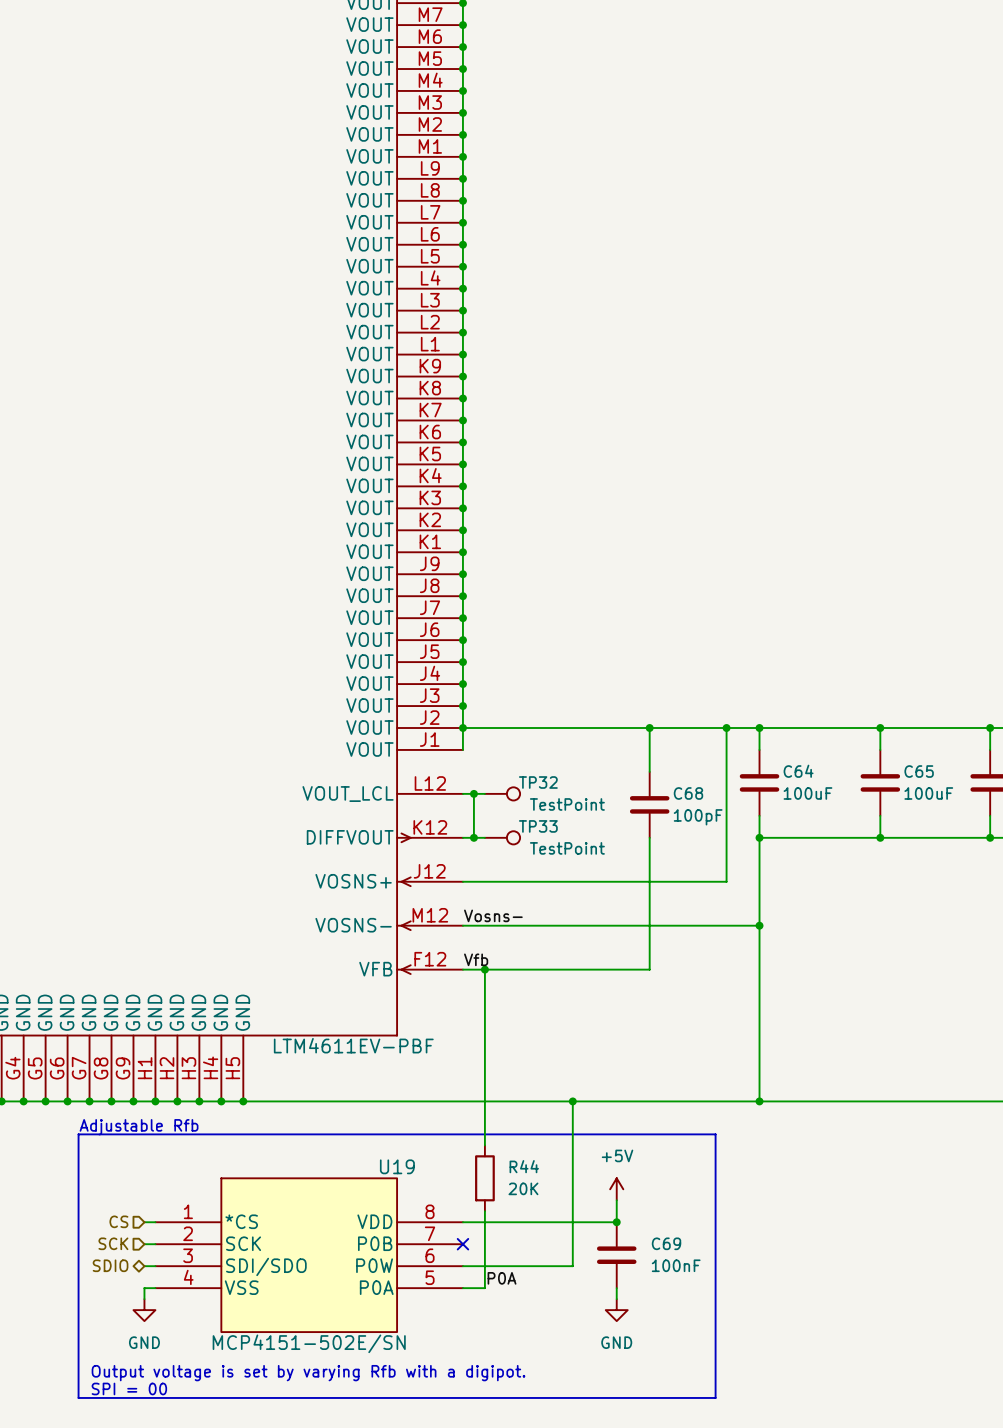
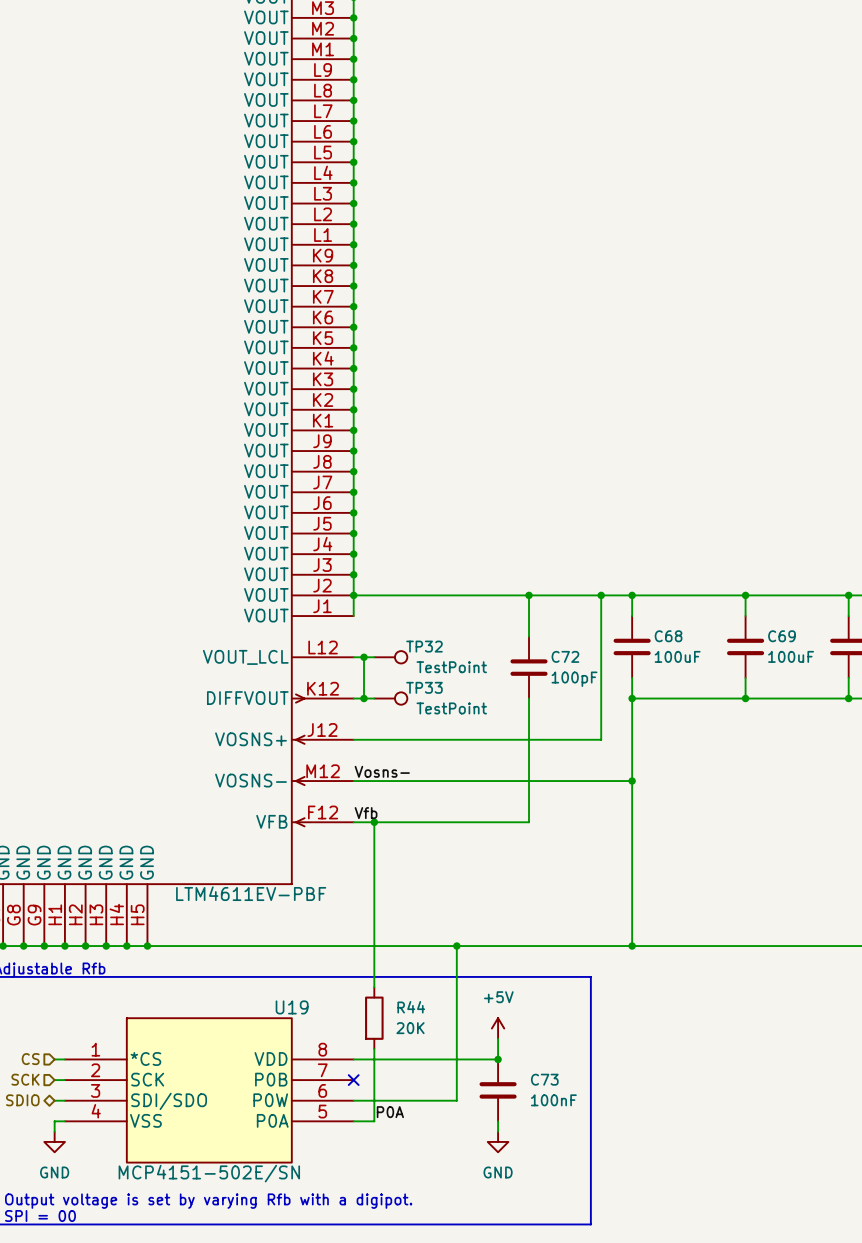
C64 name: C64 (798, 771) -> C68 (668, 636)
C65 name: C65 (919, 771) -> C69 (781, 636)
C68 name: C68 (688, 793) -> C72 (565, 656)
C69 name: C69 (666, 1243) -> C73 (544, 1079)

